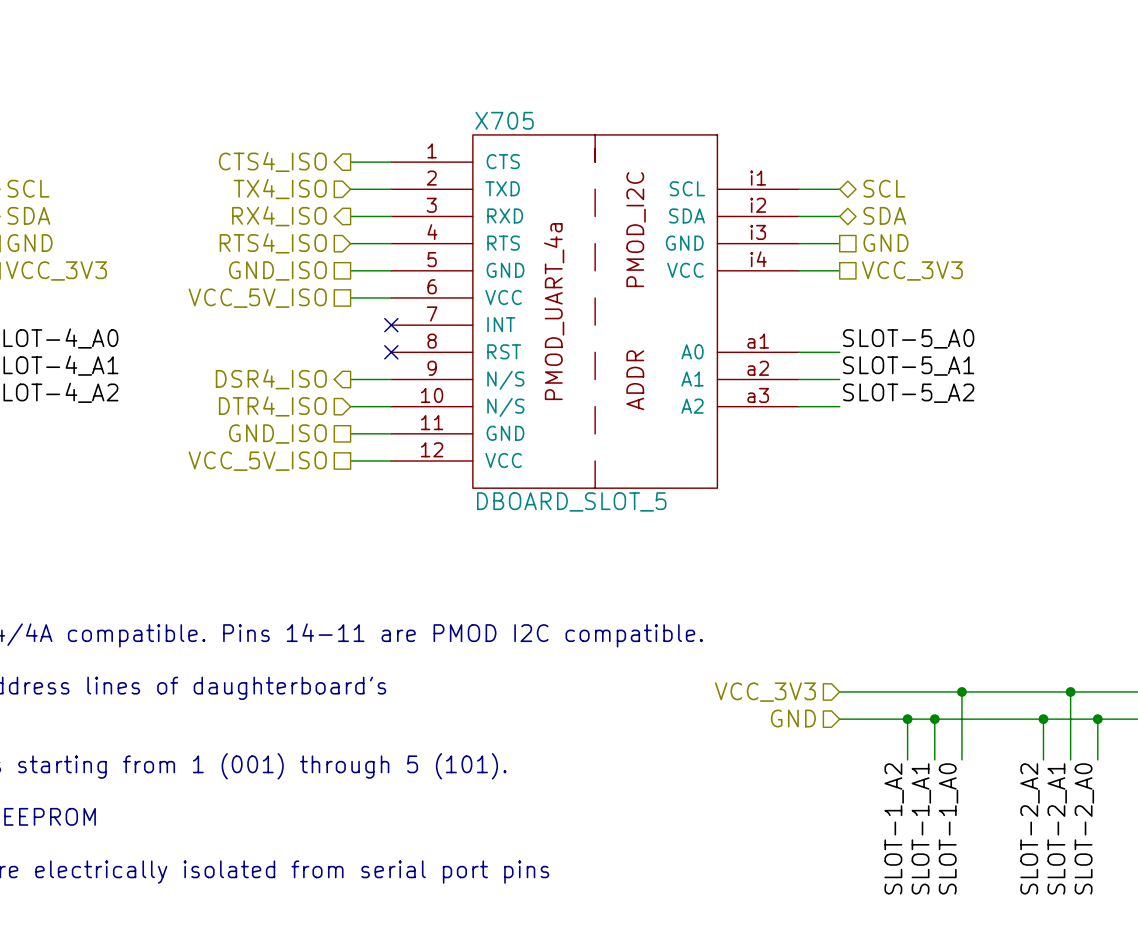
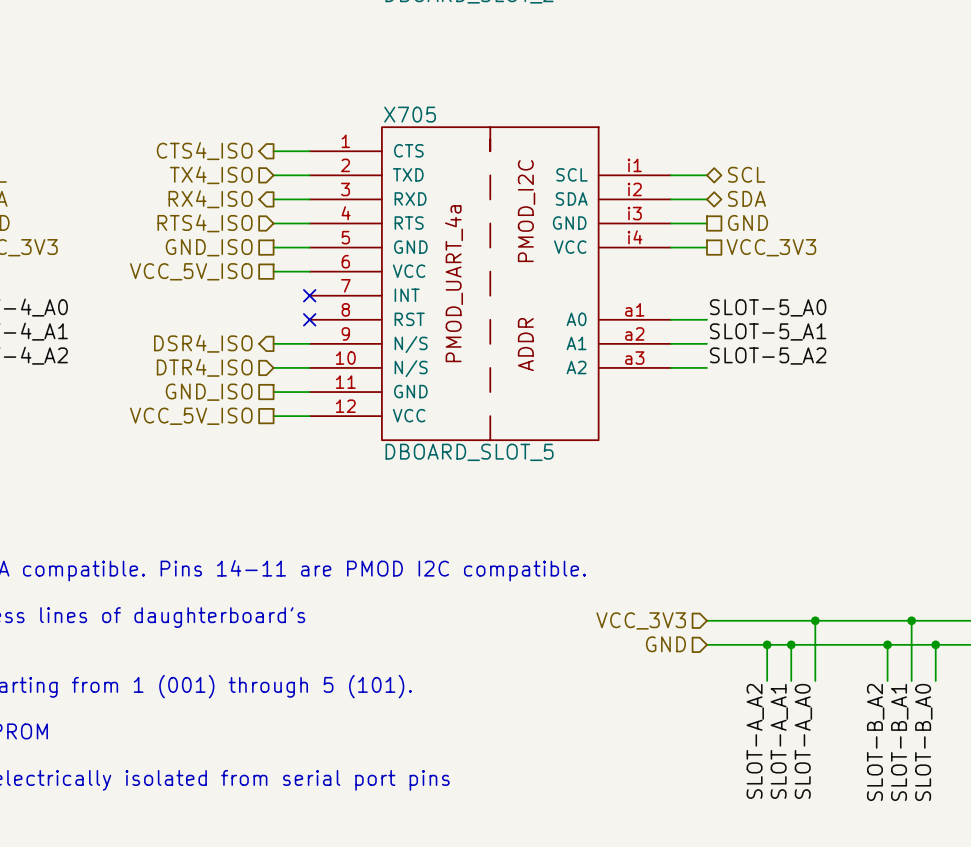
label: SLOT-1_A2 (894, 828) -> SLOT-A_A2 (755, 741)
label: SLOT-1_A1 (921, 828) -> SLOT-A_A1 (779, 741)
label: SLOT-1_A0 (948, 828) -> SLOT-A_A0 (803, 741)
label: SLOT-2_A2 (1030, 828) -> SLOT-B_A2 (875, 742)
label: SLOT-2_A1 (1057, 828) -> SLOT-B_A1 (899, 742)
label: SLOT-2_A0 (1084, 828) -> SLOT-B_A0 (923, 742)

